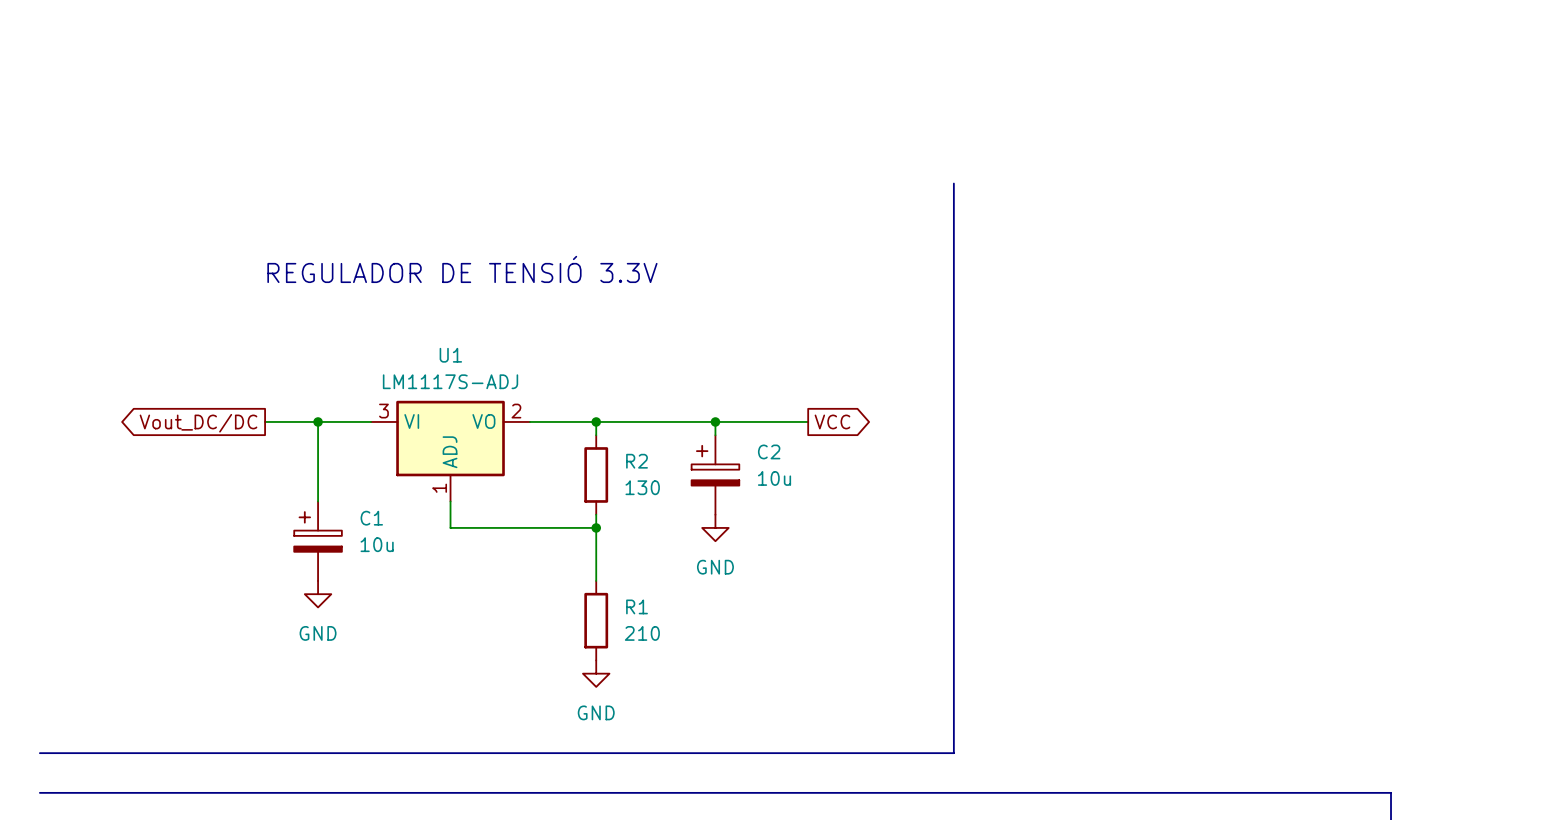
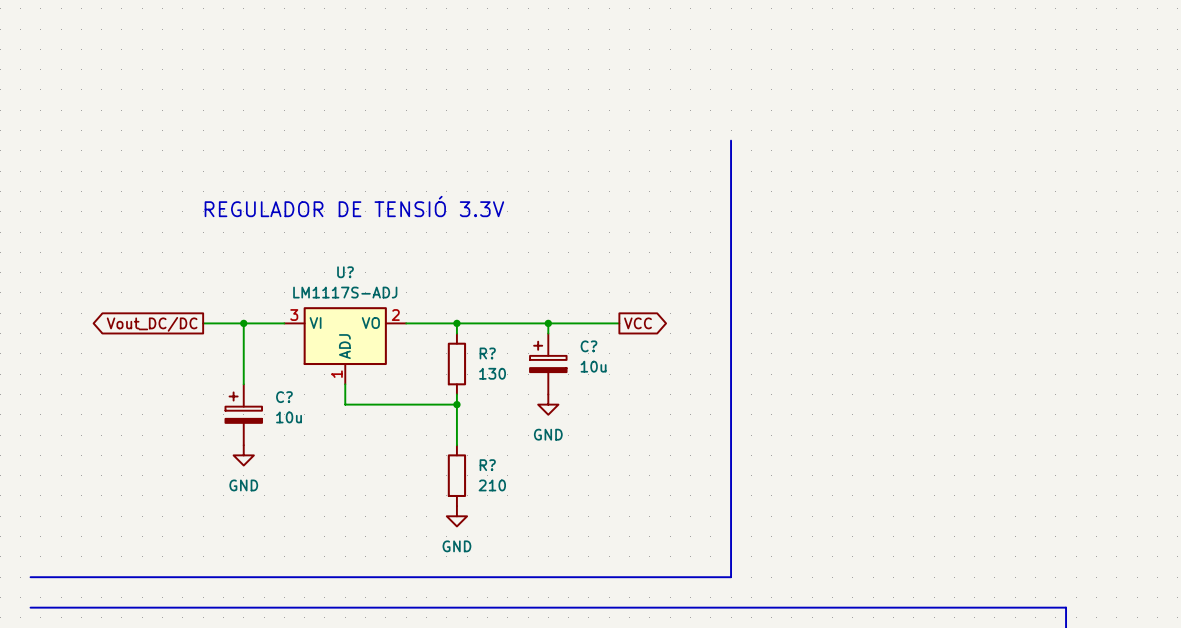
U1 name: U1 (450, 355) -> U? (345, 272)
C2 name: C2 (769, 451) -> C? (588, 346)
R2 name: R2 (637, 461) -> R? (487, 353)
C1 name: C1 (371, 518) -> C? (284, 397)
R1 name: R1 (637, 606) -> R? (487, 465)

